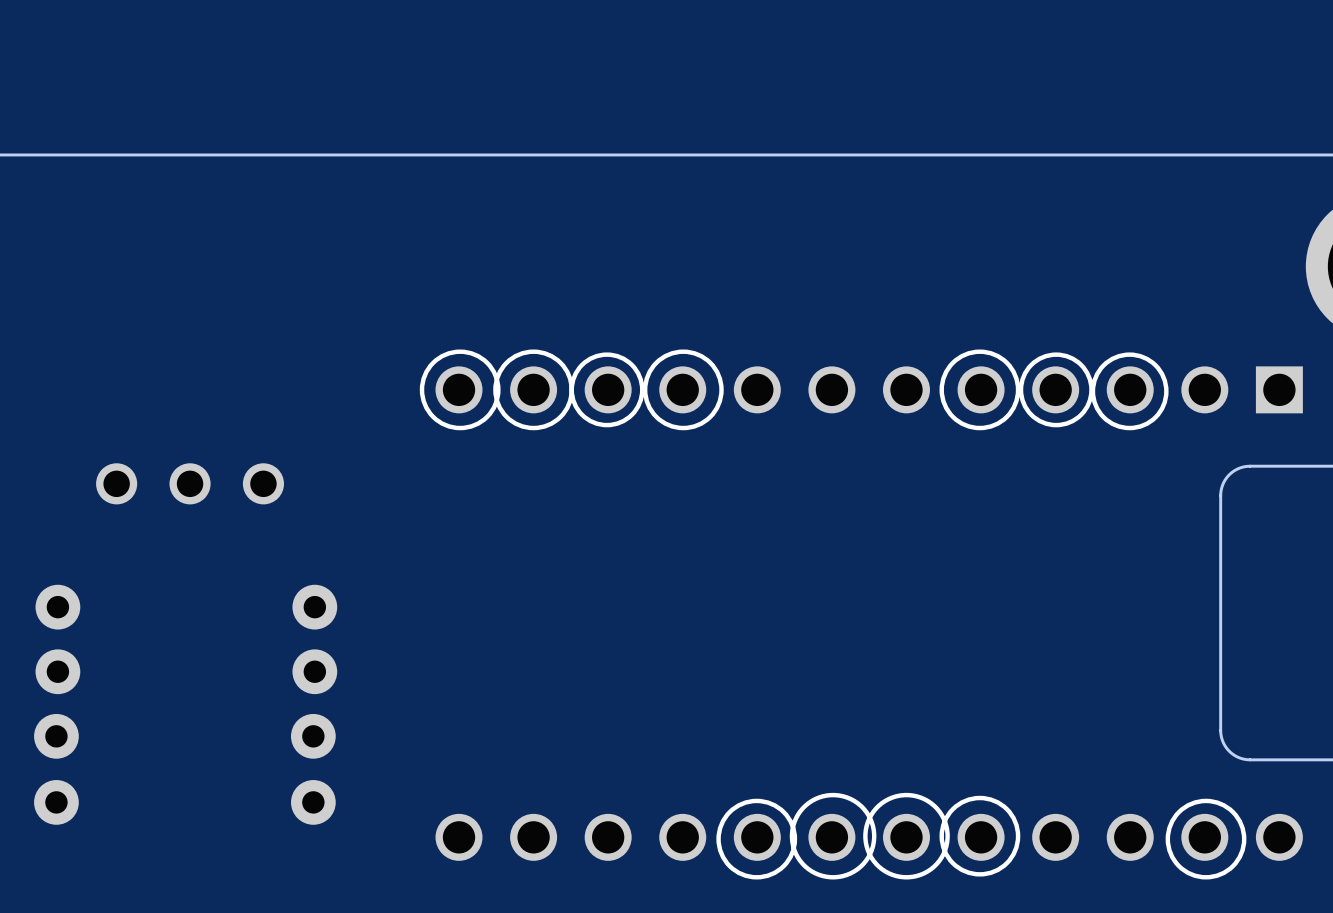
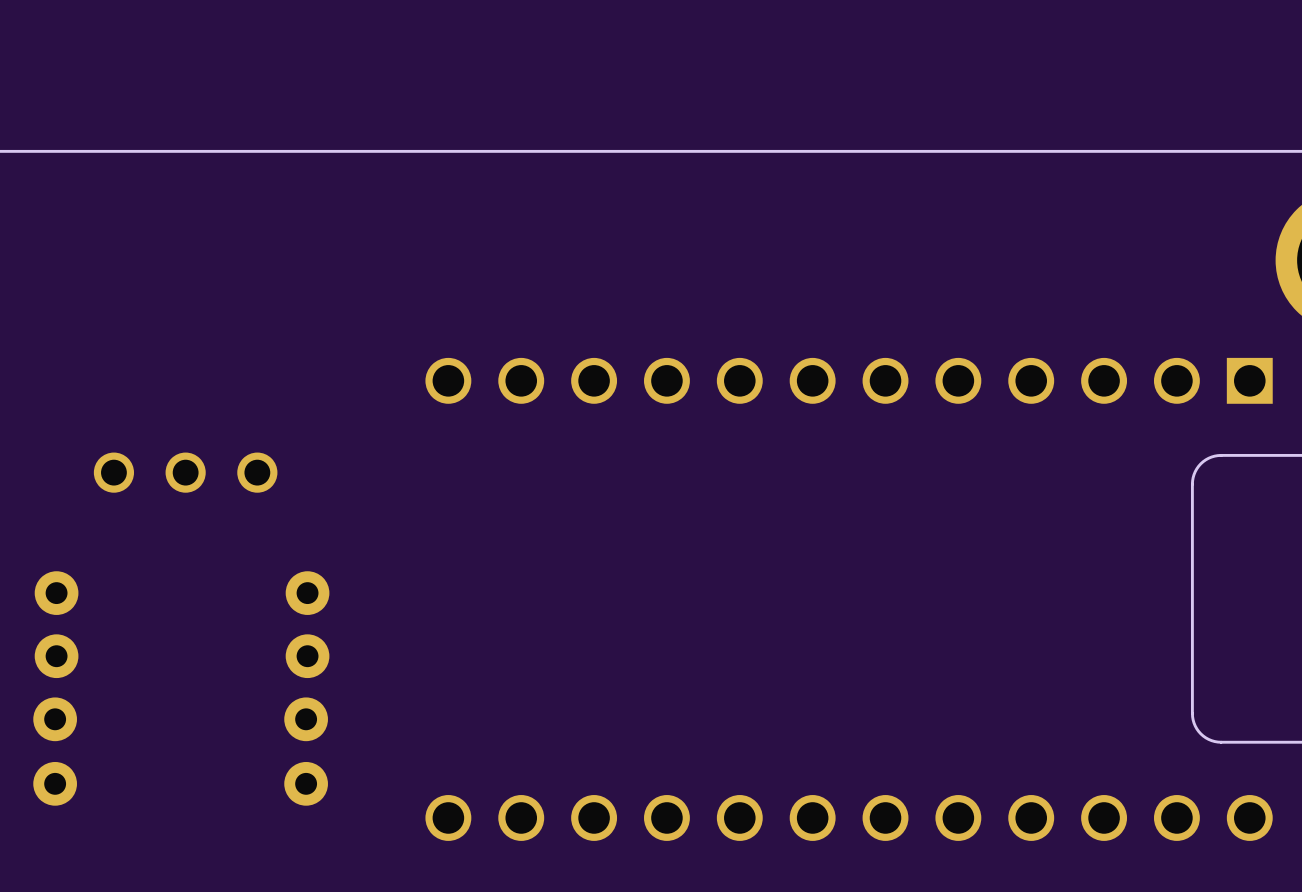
drawing: [419, 349, 724, 431] -> none
drawing: [939, 349, 1169, 431] -> none
drawing: [716, 792, 1021, 880] -> none
drawing: [1165, 798, 1247, 880] -> none

